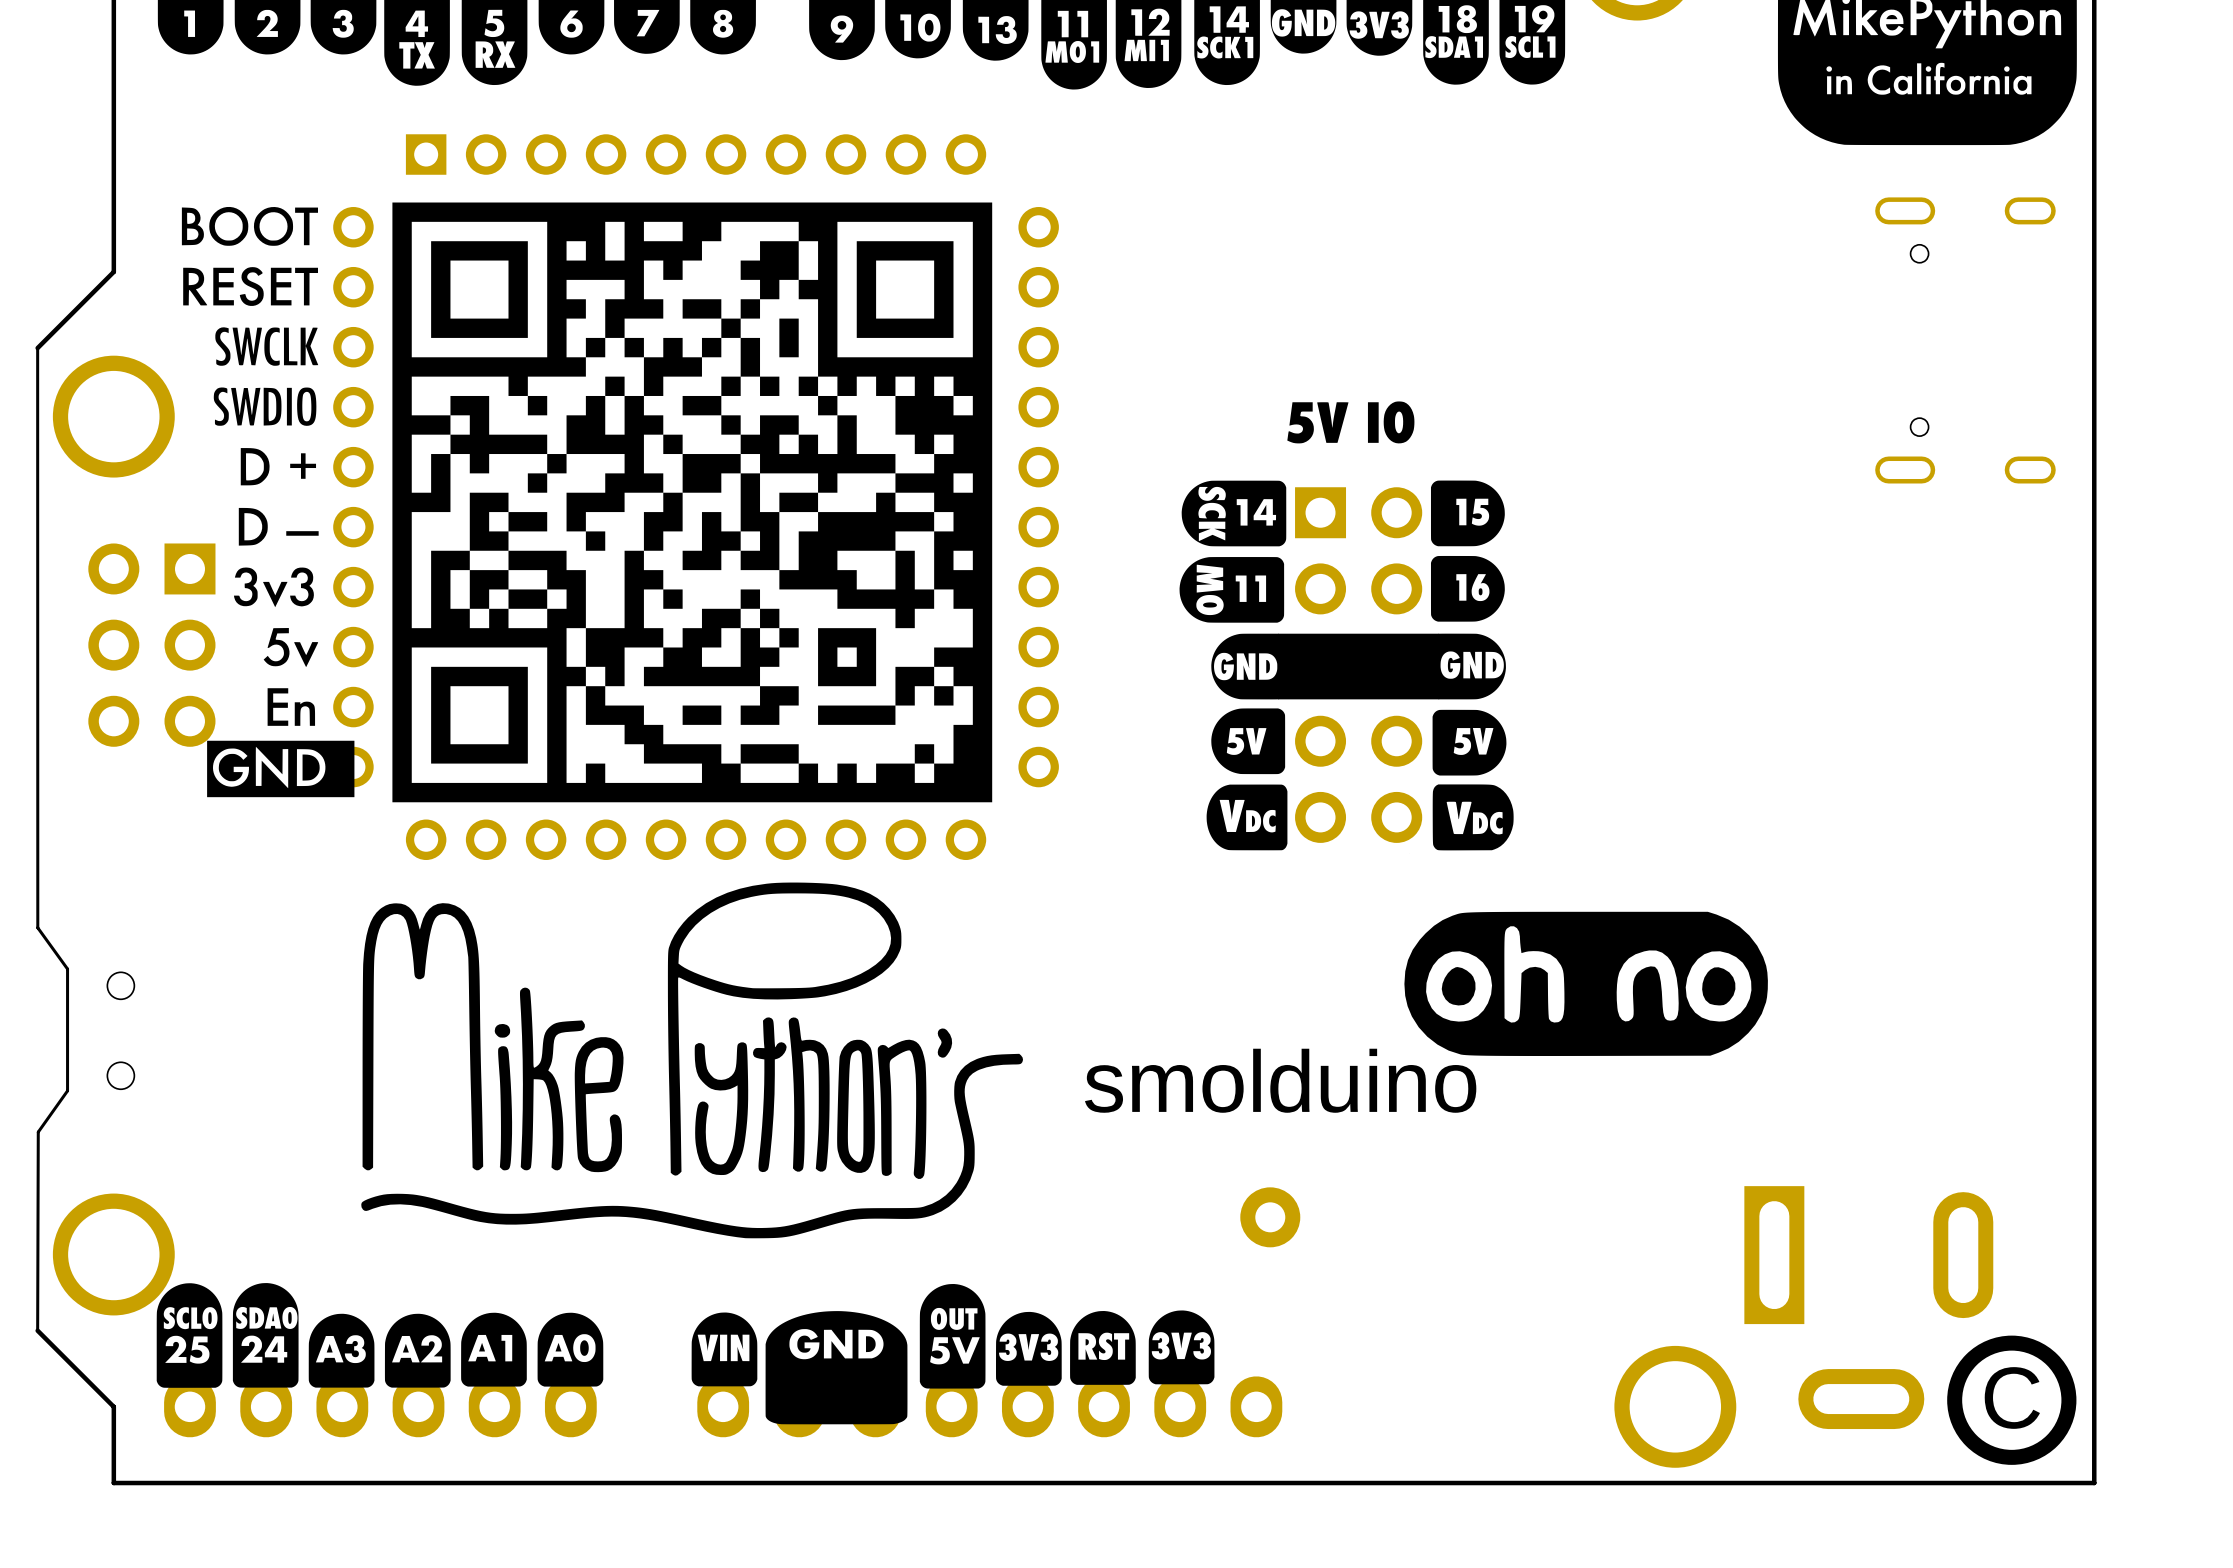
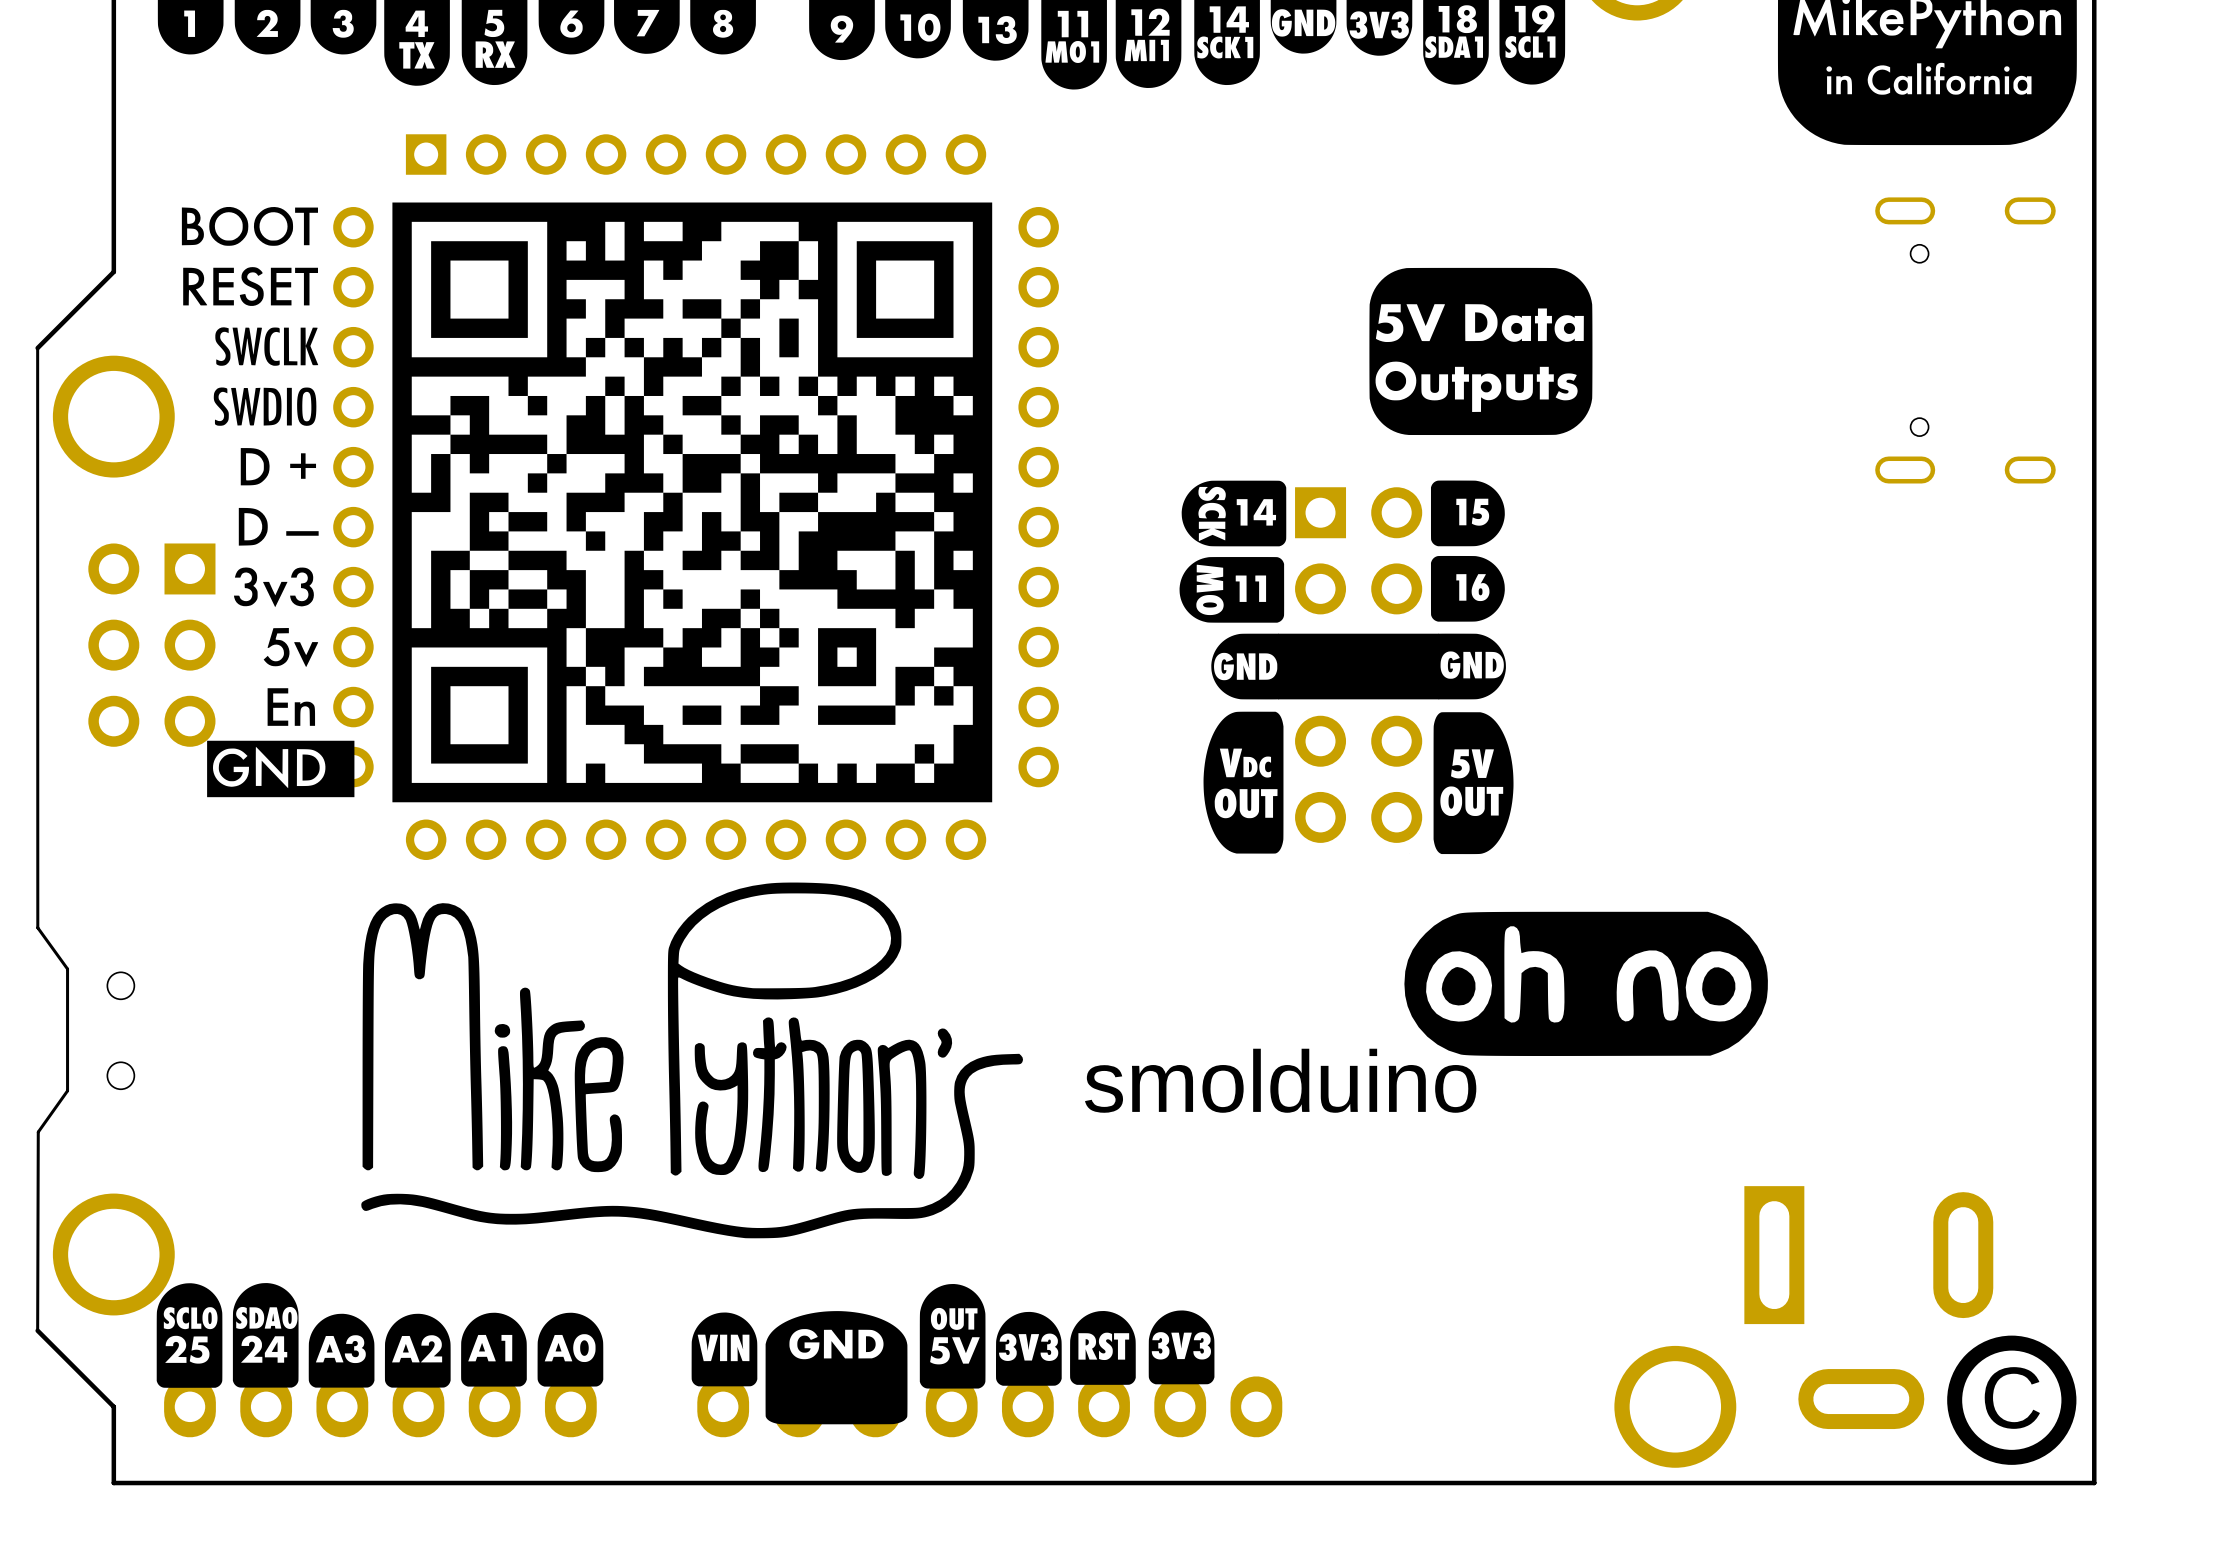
drawing: none -> [1369, 267, 1593, 436]
drawing: [1287, 401, 1415, 444] -> none
part footprint: [1179, 480, 1514, 854] -> [1179, 480, 1514, 855]
part: (1270, 1217) -> none

